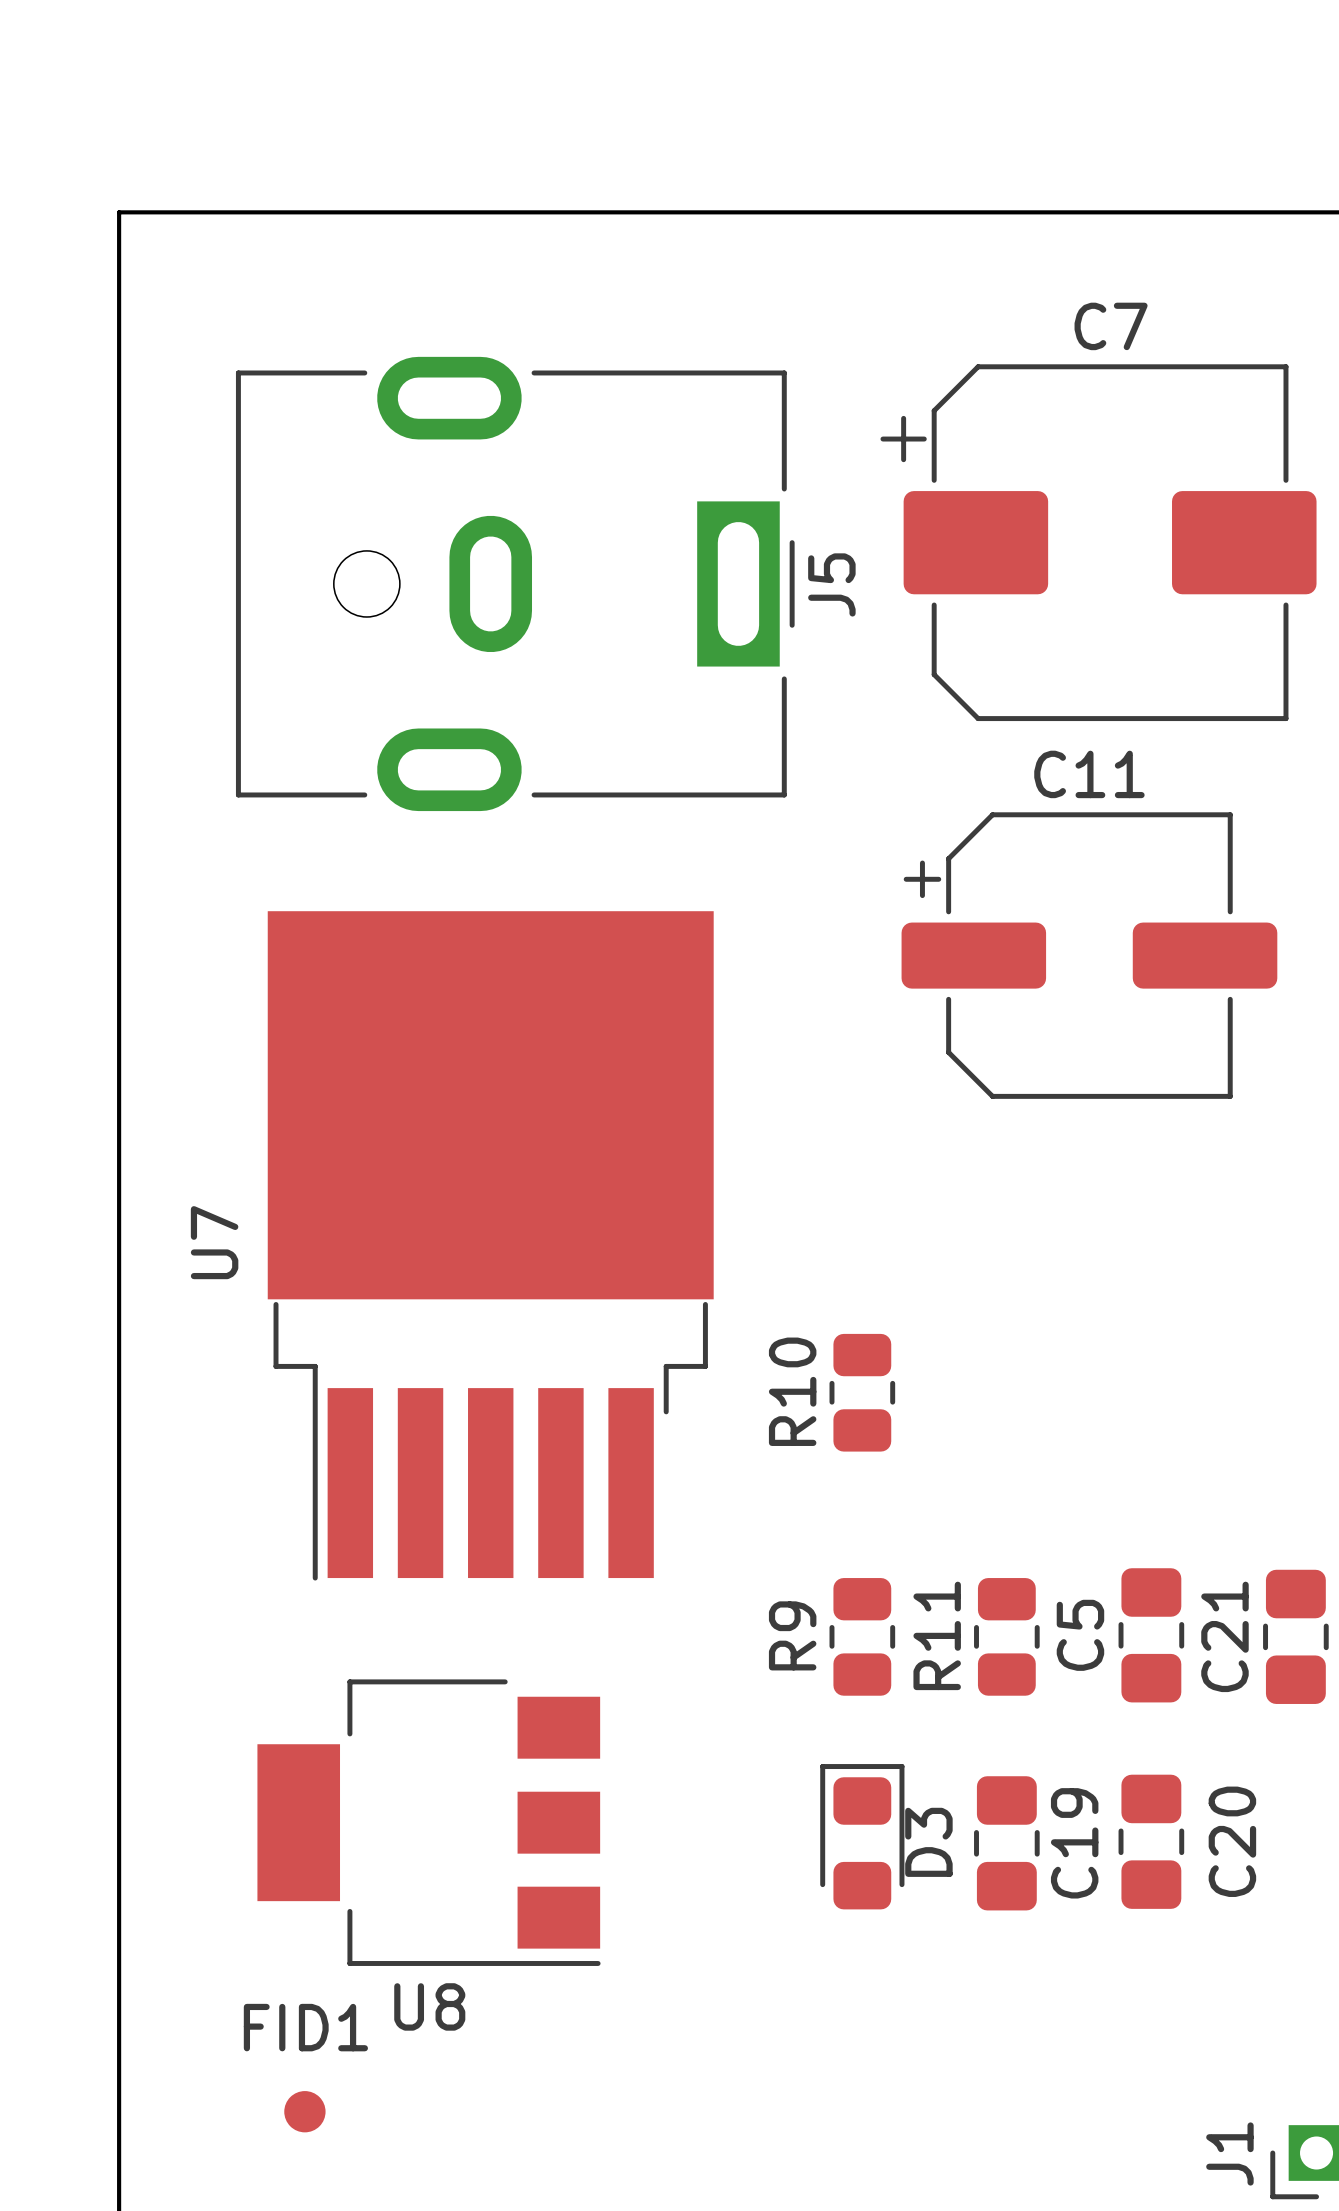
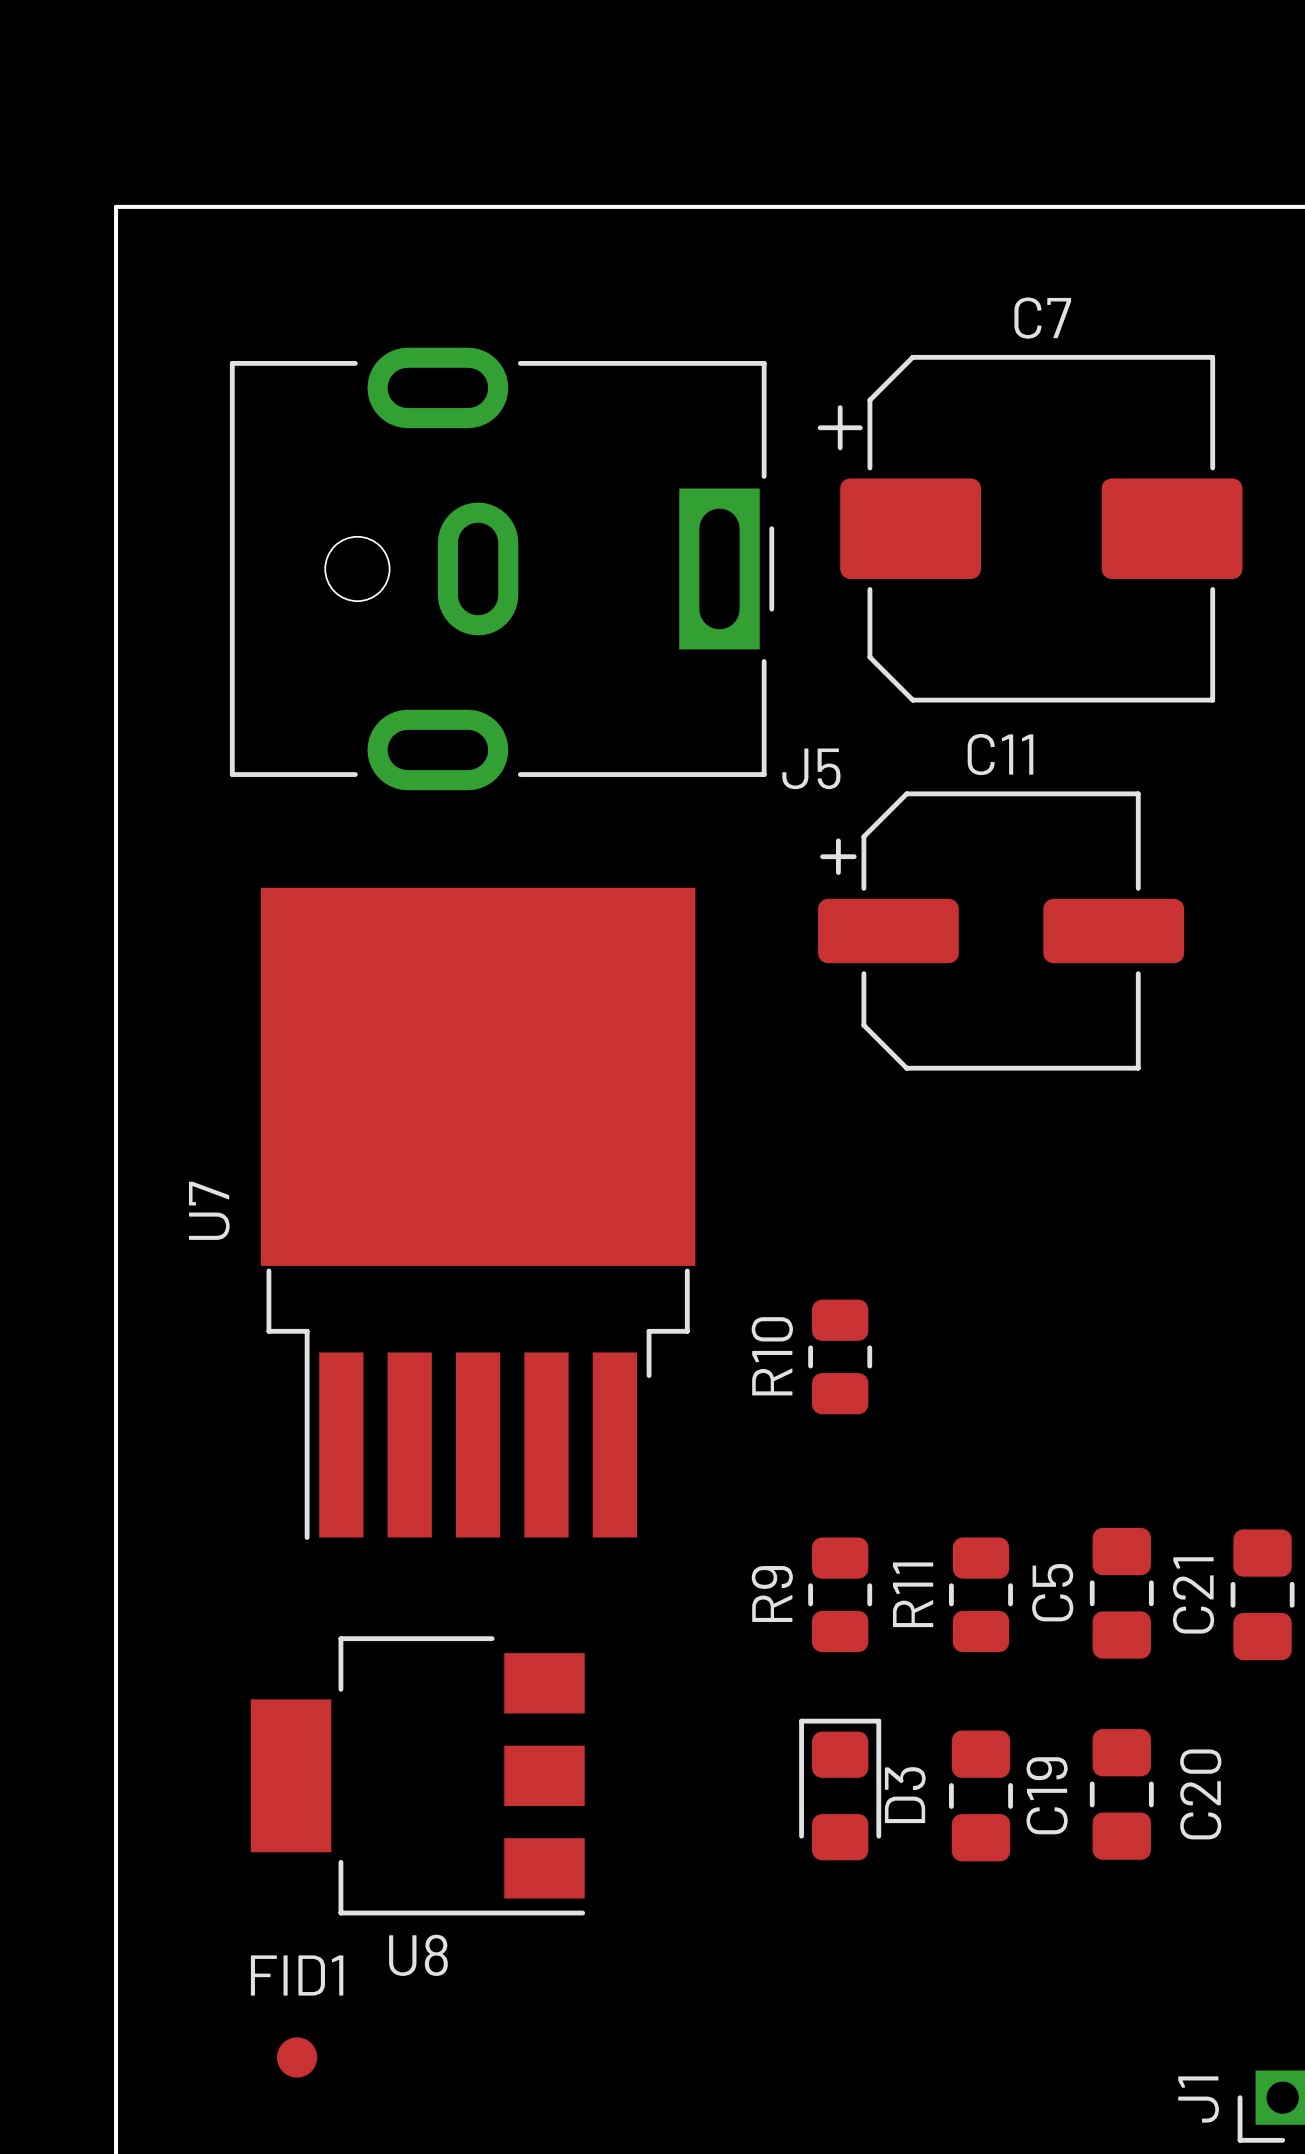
C7 position: (1098, 542) -> (1030, 528)
J5 name rotation: 0° (831, 584) -> 90° clockwise (811, 768)
J5 name position: J5 (831, 584) -> J5 (811, 768)
C11 position: (1089, 955) -> (1001, 931)

